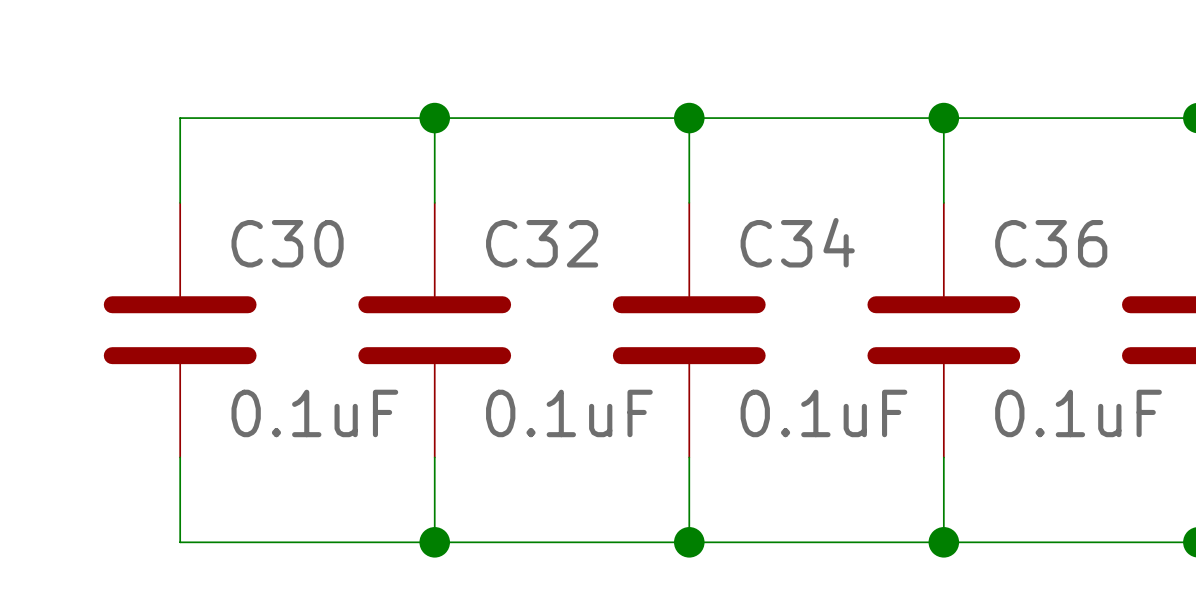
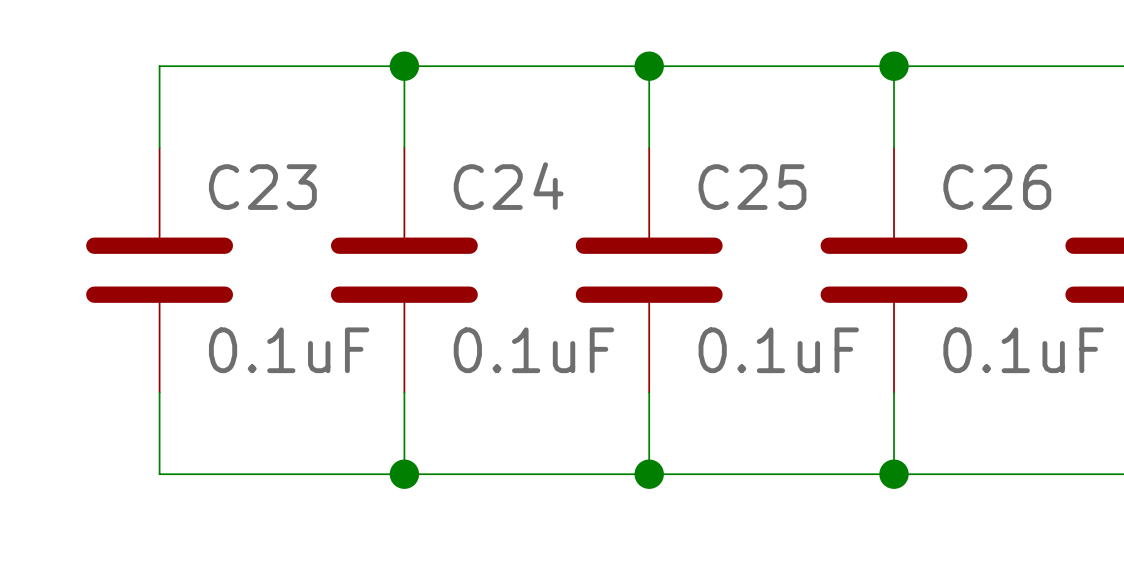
C34 name: C34 (797, 242) -> C25 (752, 187)
C30 name: C30 (287, 243) -> C23 (262, 187)
C32 name: C32 (542, 243) -> C24 (508, 186)
C36 name: C36 (1051, 243) -> C26 (997, 187)

